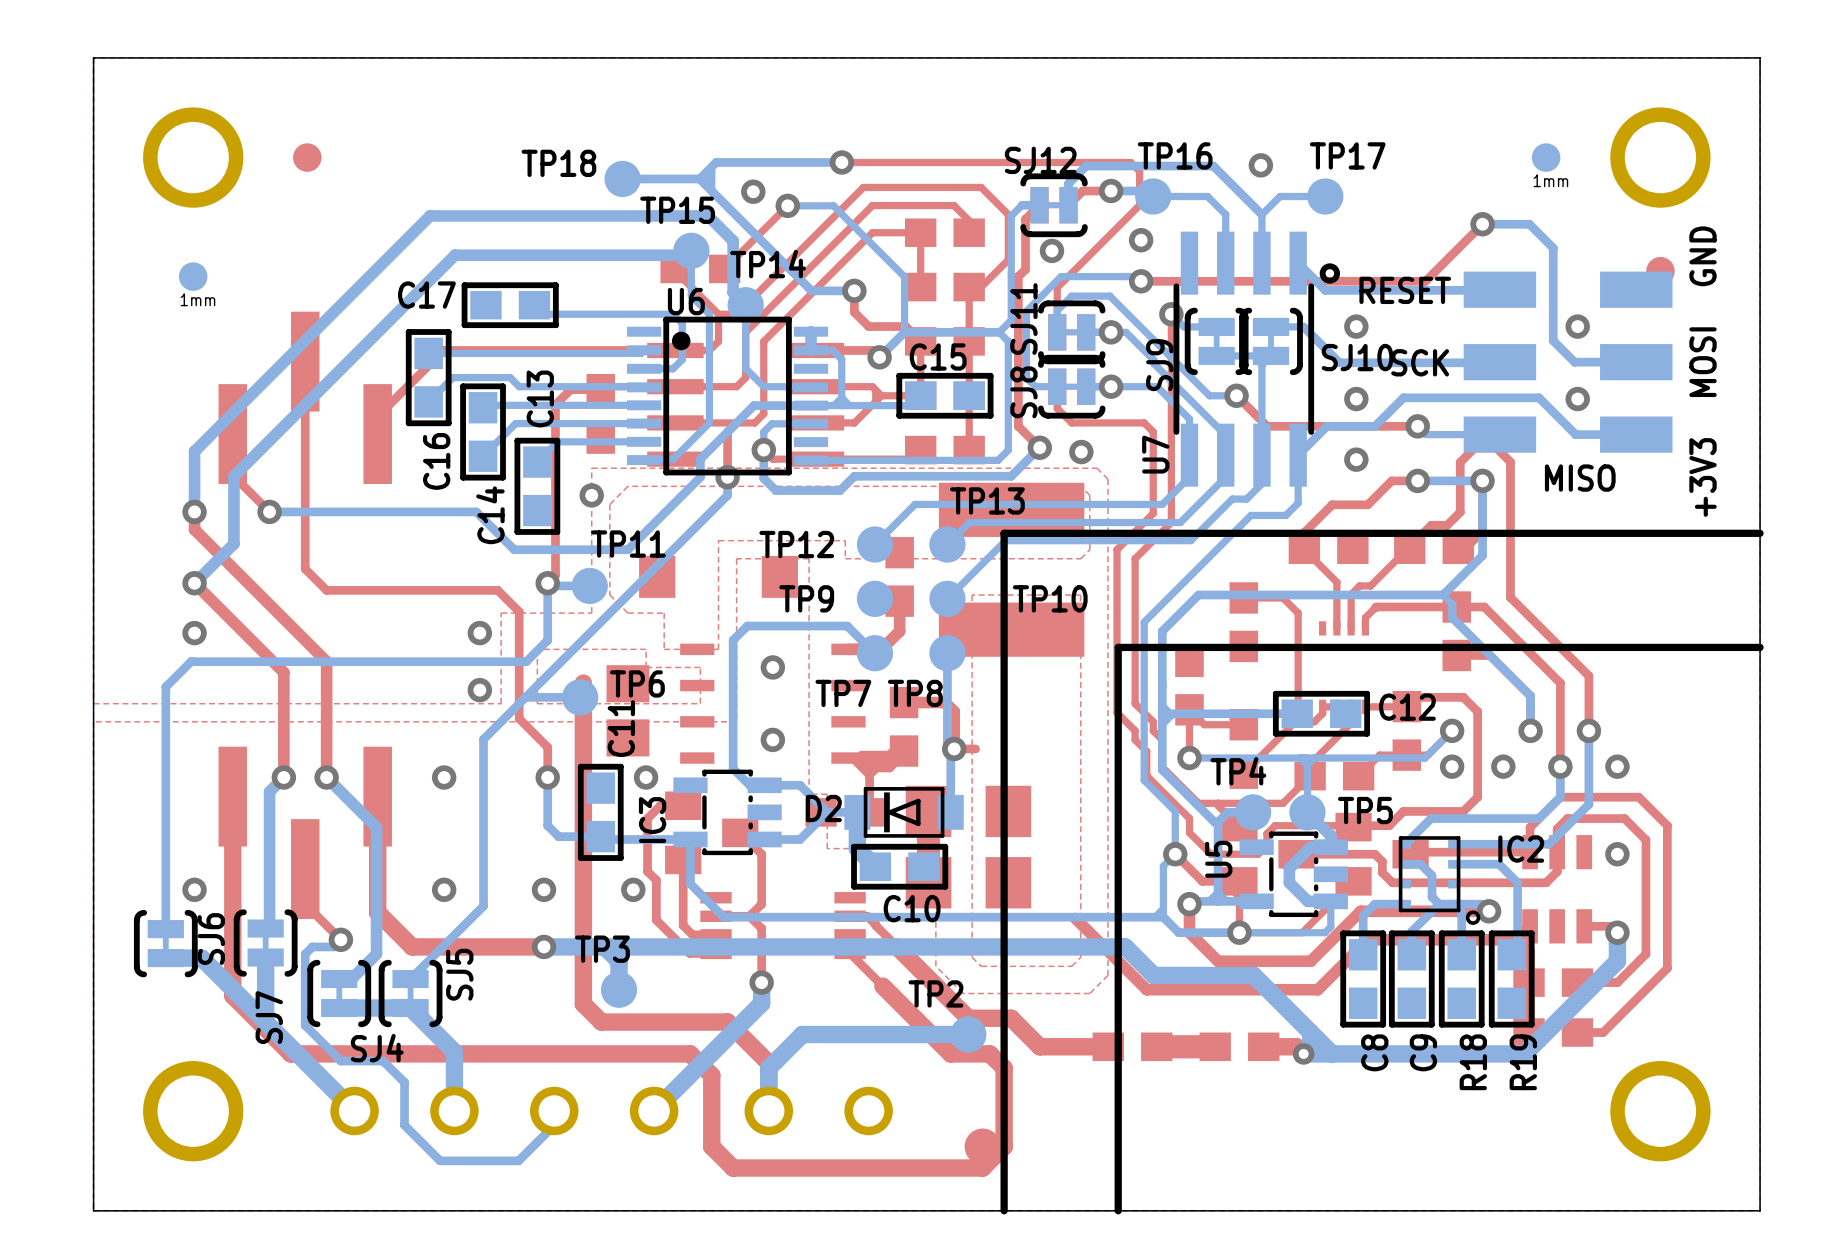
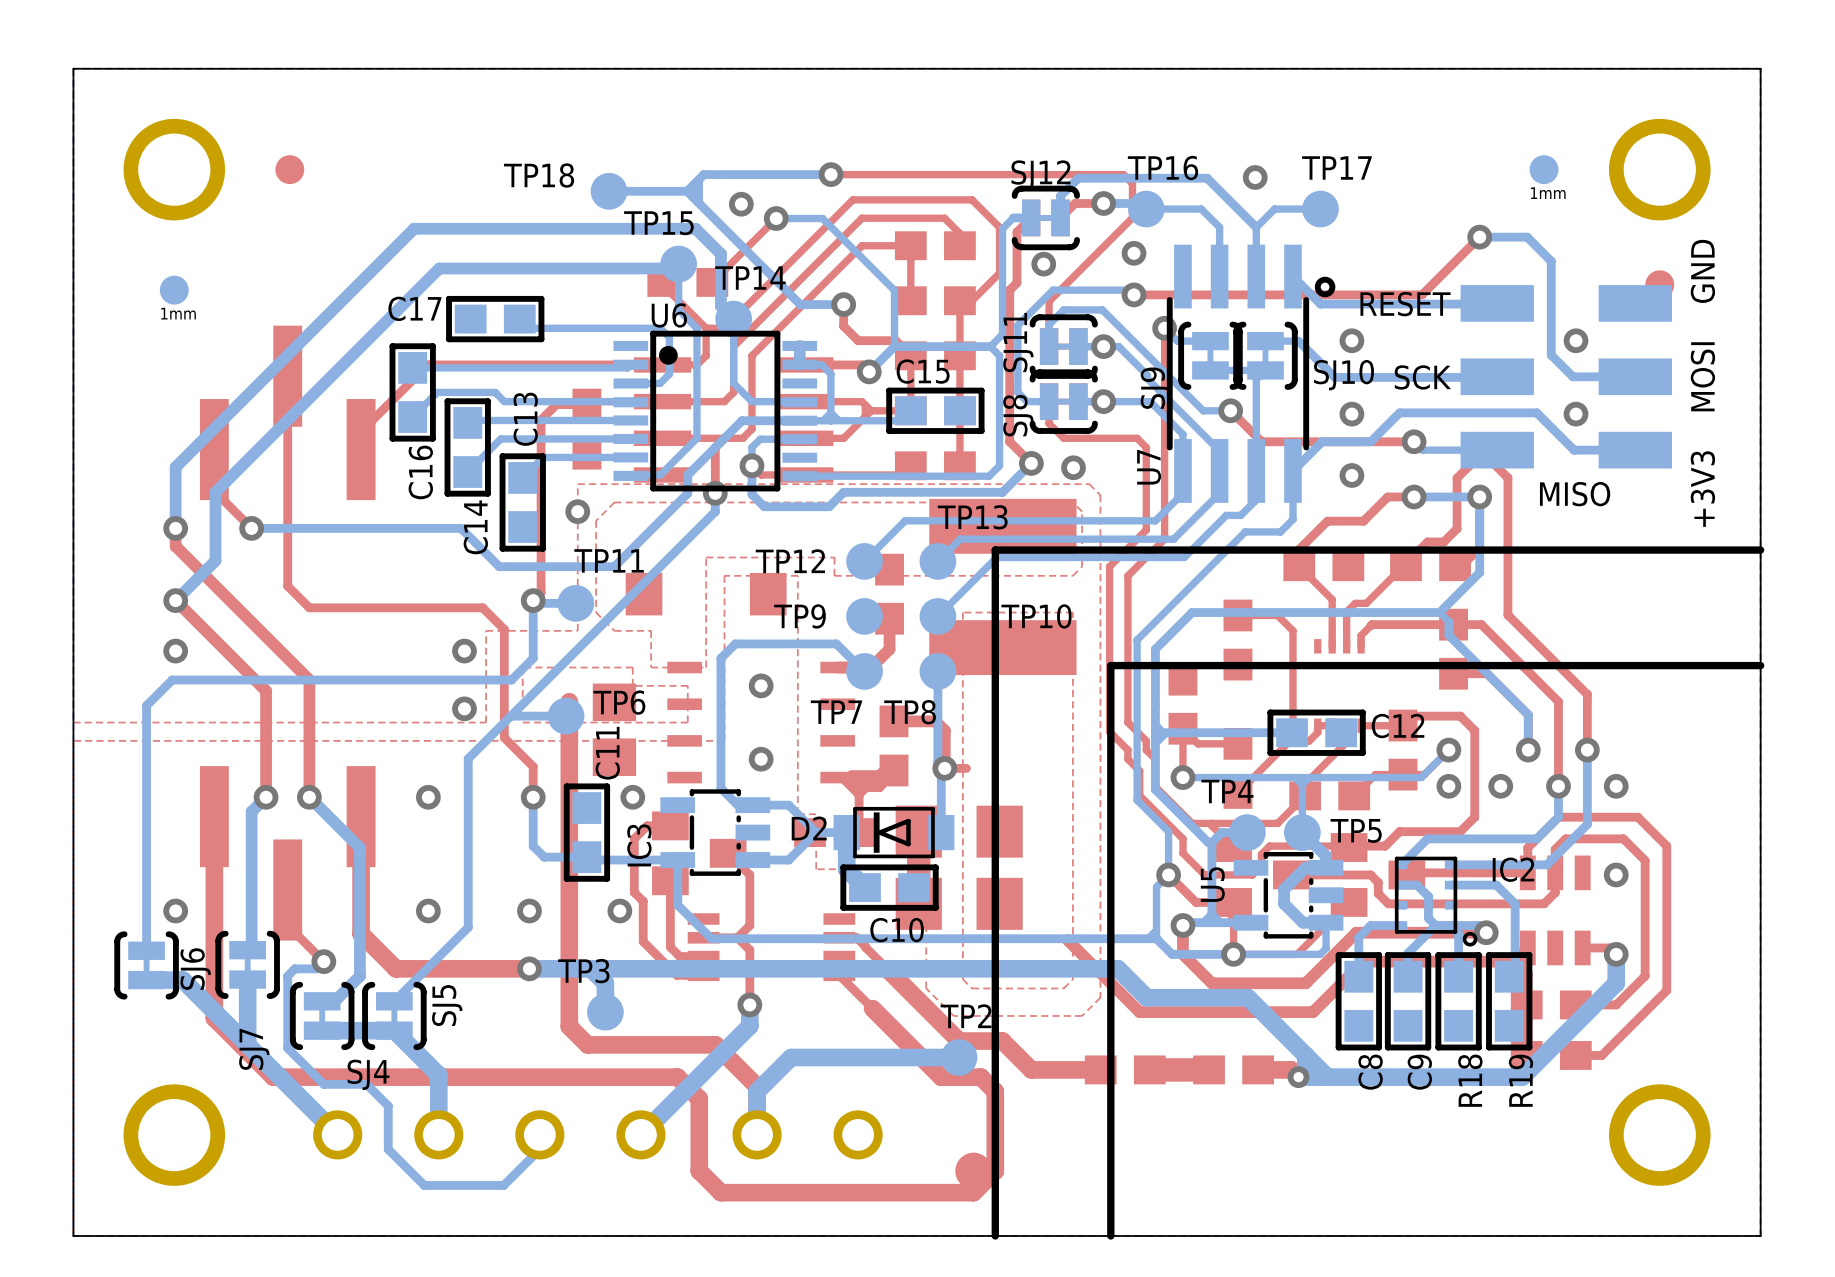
TP2 name position: TP2 (935, 993) -> TP2 (966, 1016)

